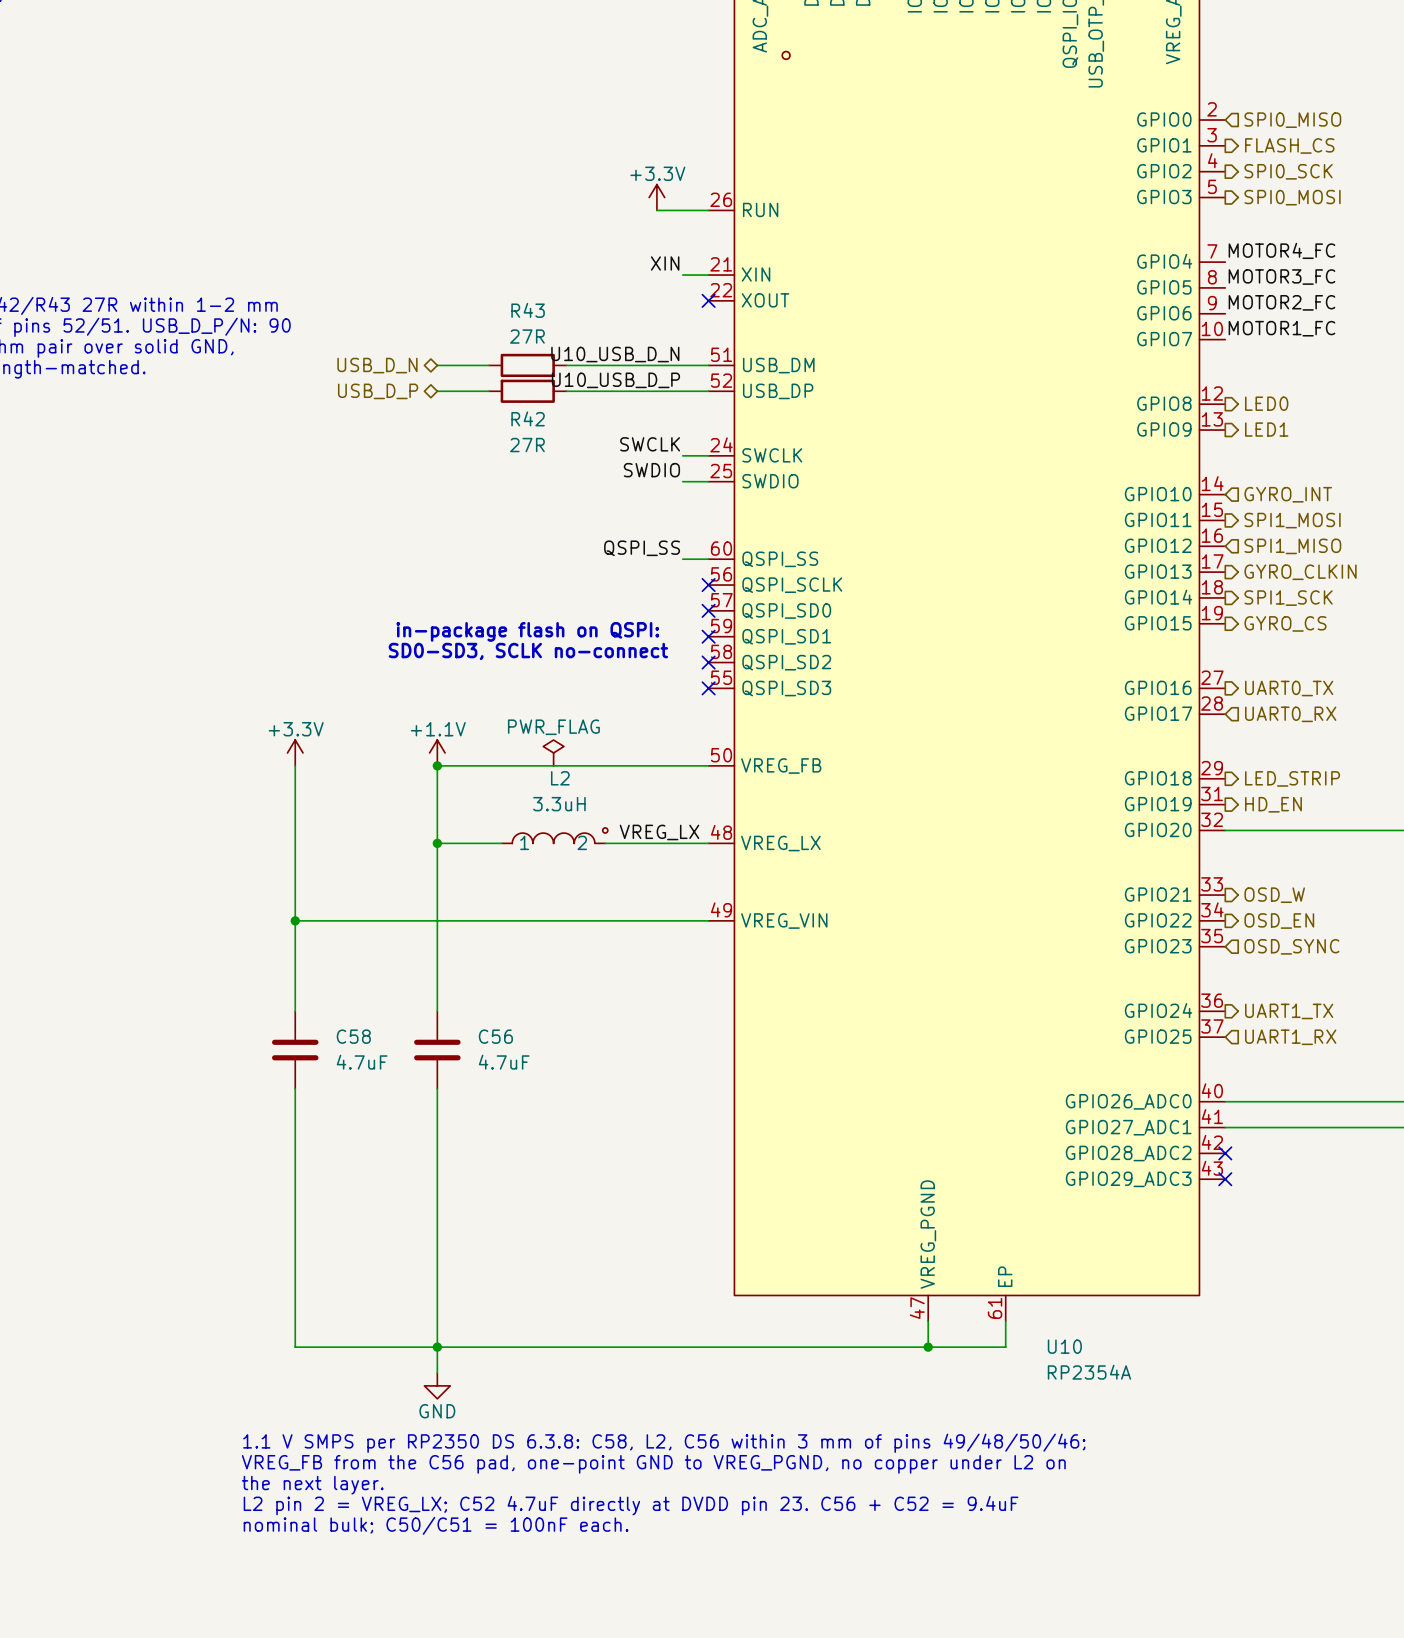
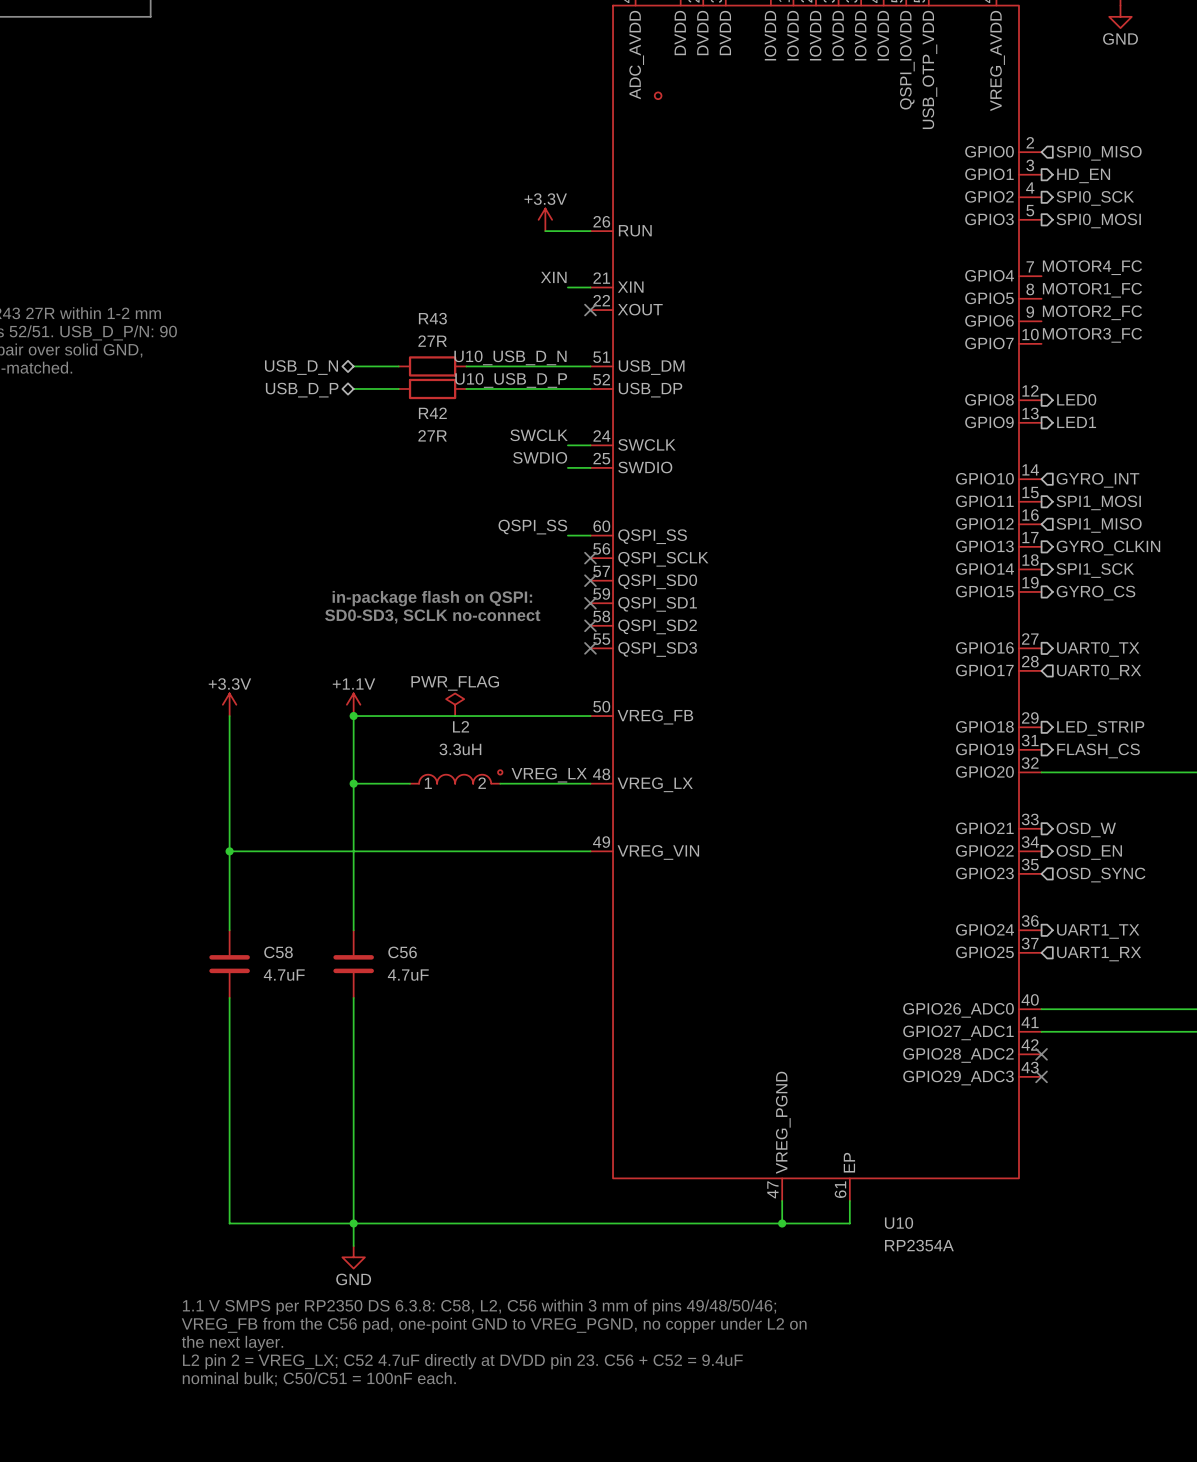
hierarchical label: FLASH_CS (1289, 145) -> HD_EN (1083, 175)
label: MOTOR3_FC (1281, 277) -> MOTOR1_FC (1092, 290)
label: MOTOR1_FC (1281, 328) -> MOTOR3_FC (1092, 335)
hierarchical label: HD_EN (1273, 804) -> FLASH_CS (1098, 750)

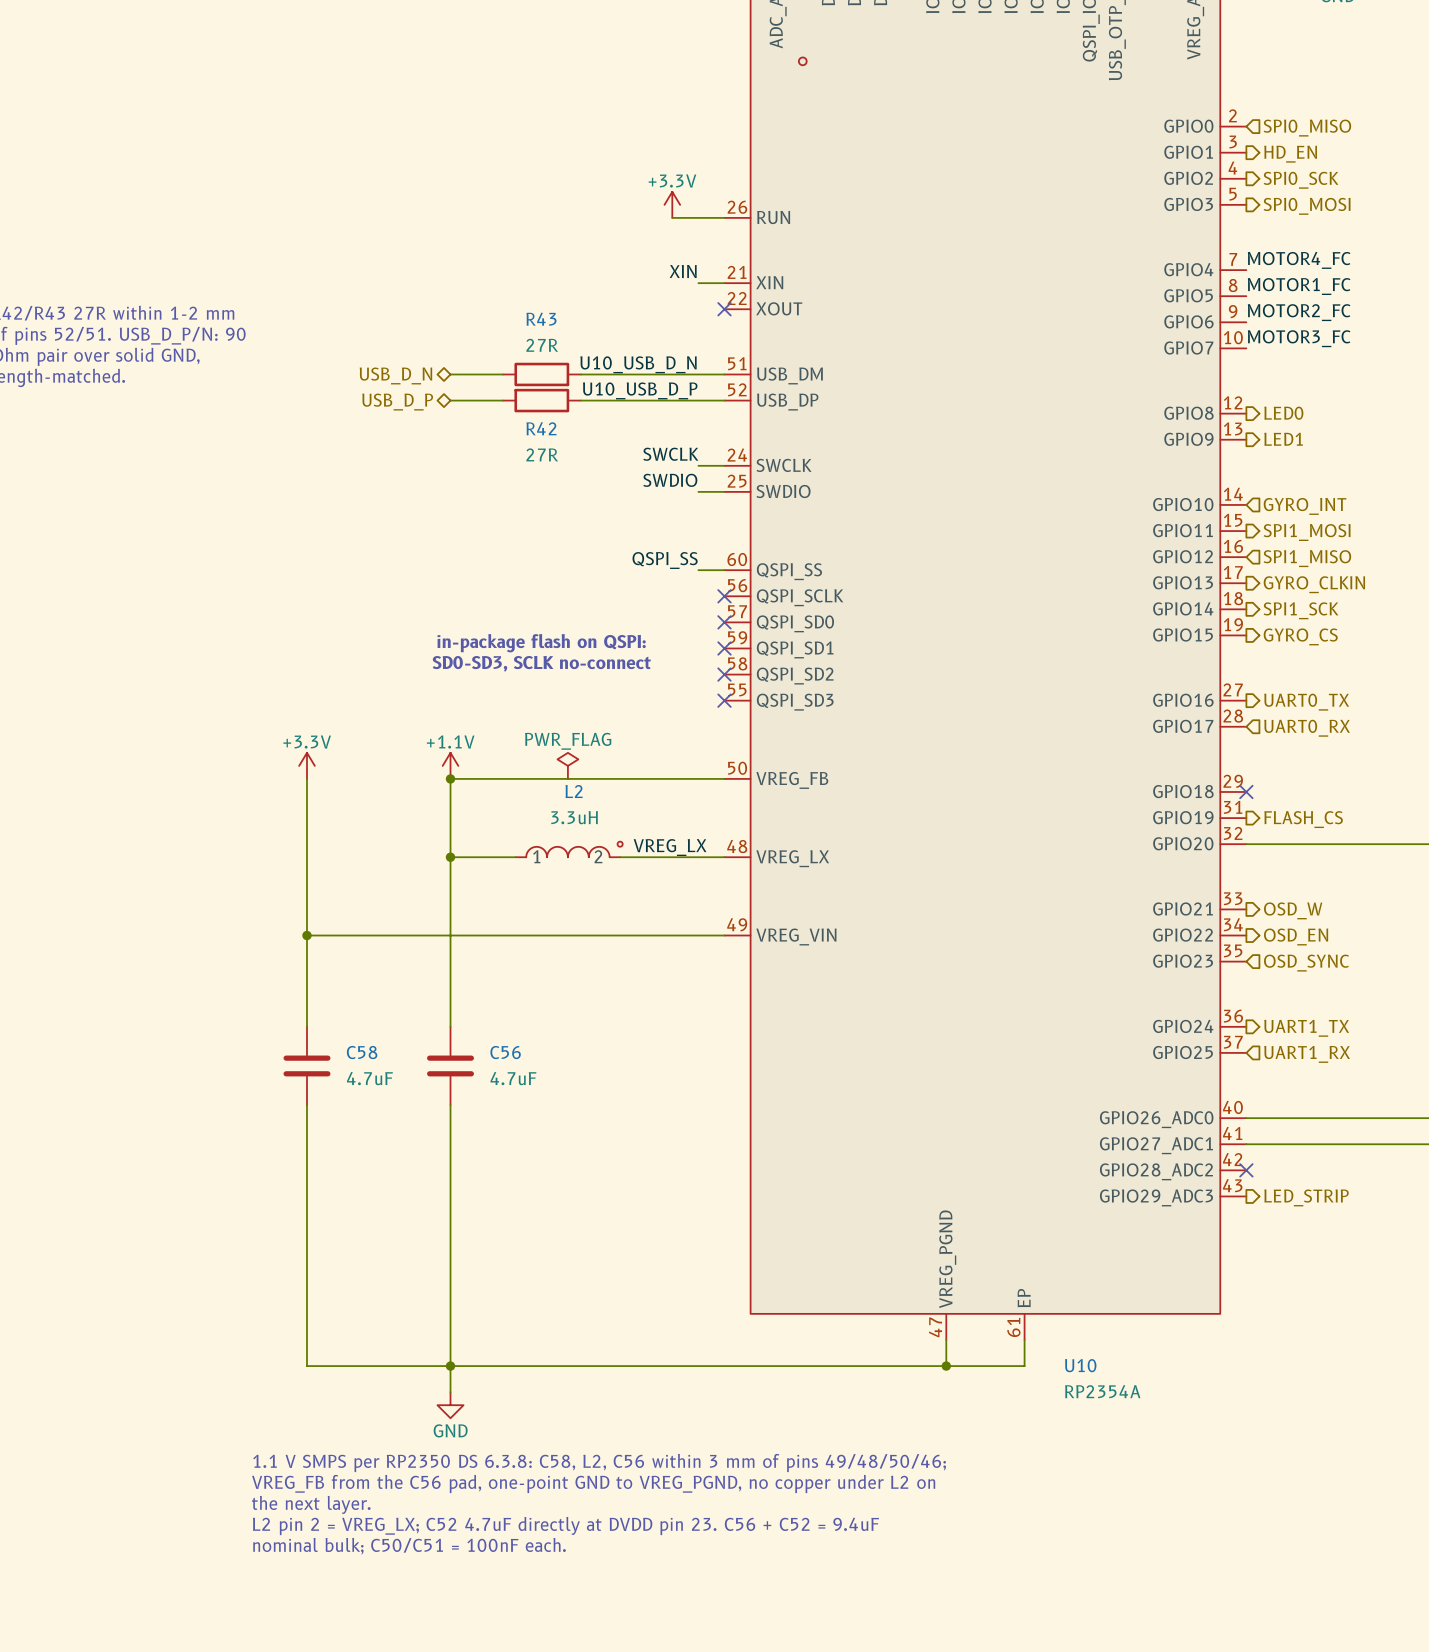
no-connect mark: none -> (1246, 791)
hierarchical label: LED_STRIP (1100, 728) -> none
no-connect mark: (1041, 1076) -> none
hierarchical label: none -> LED_STRIP (1306, 1197)

